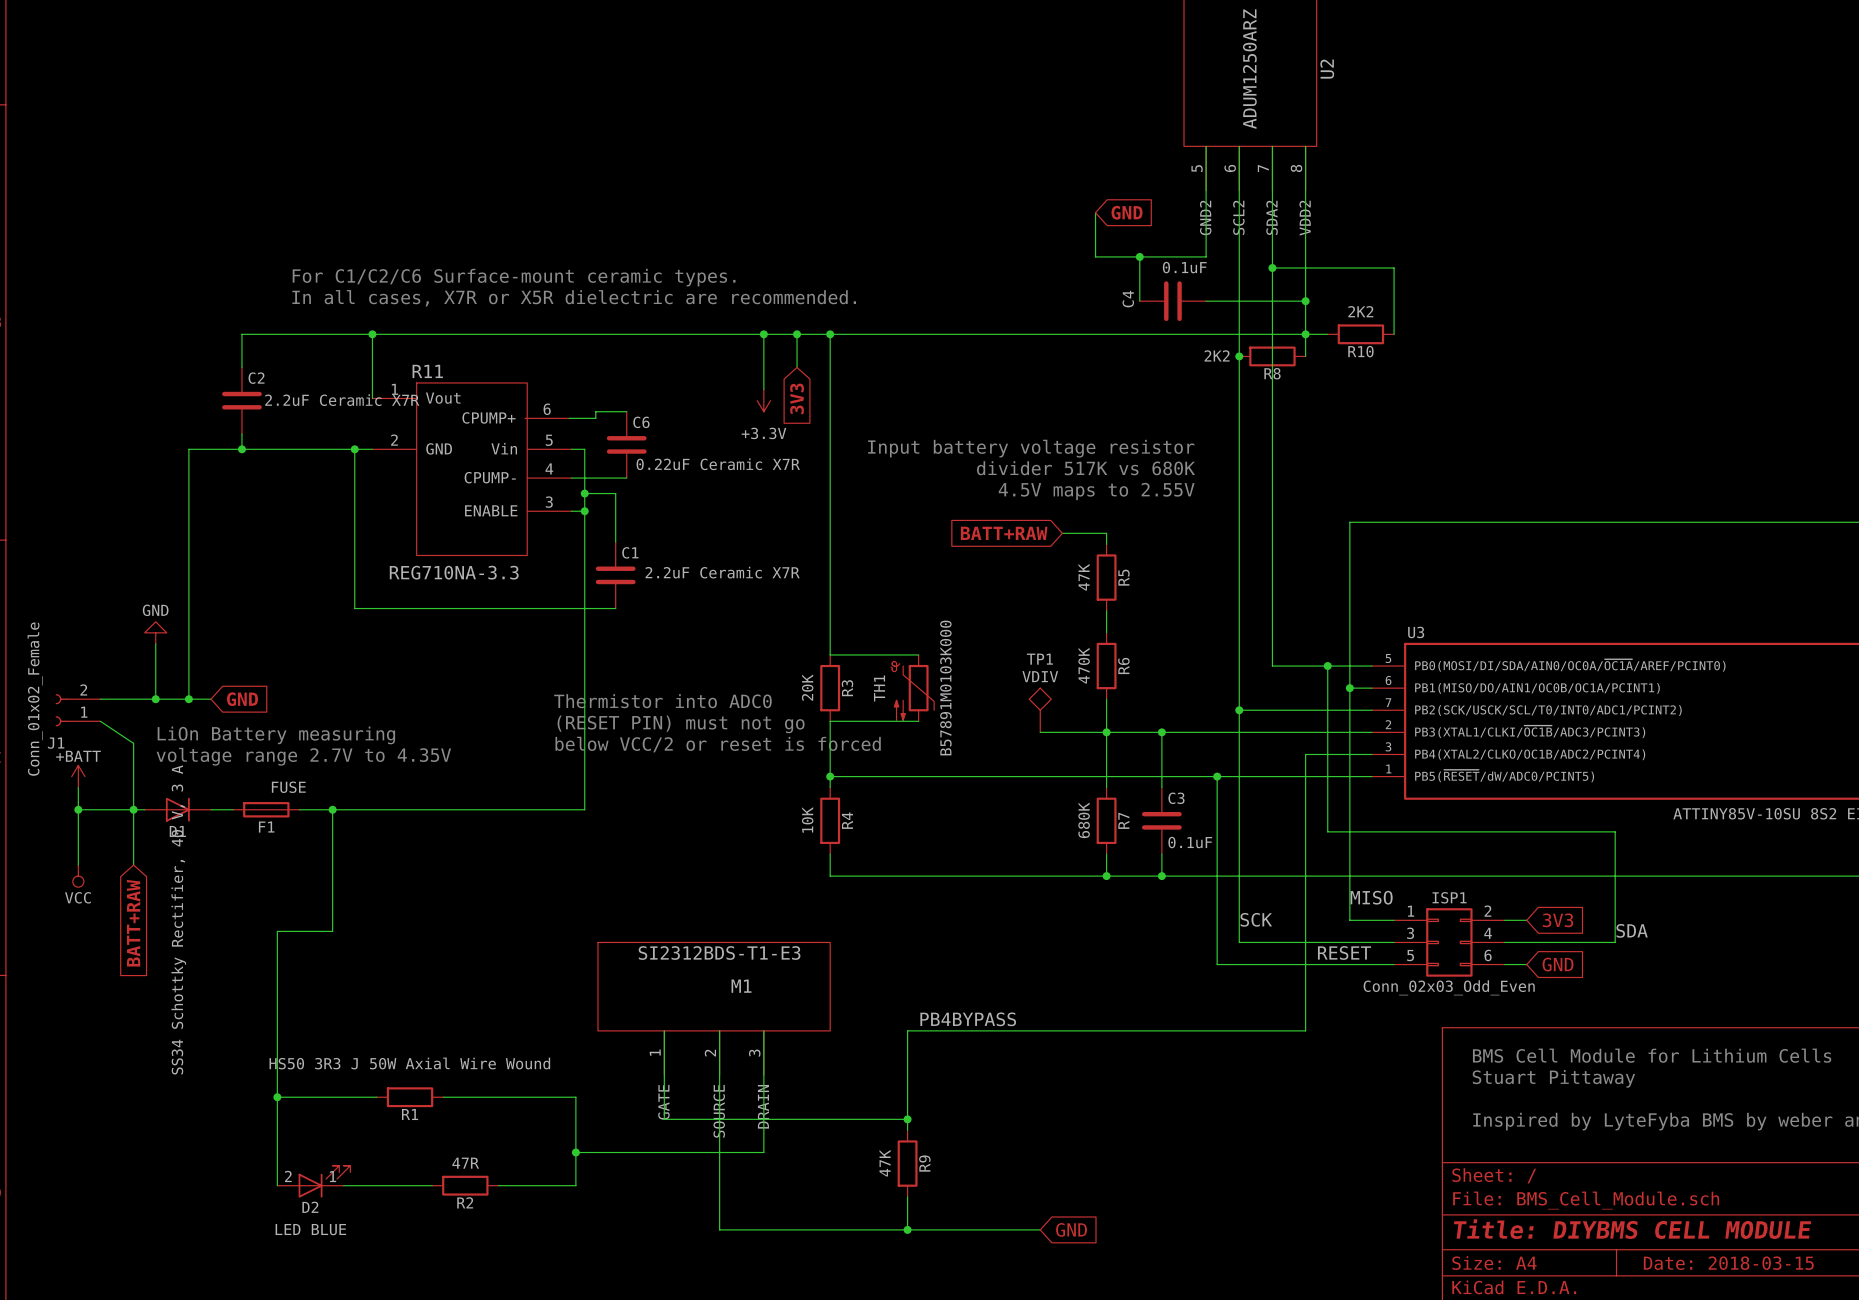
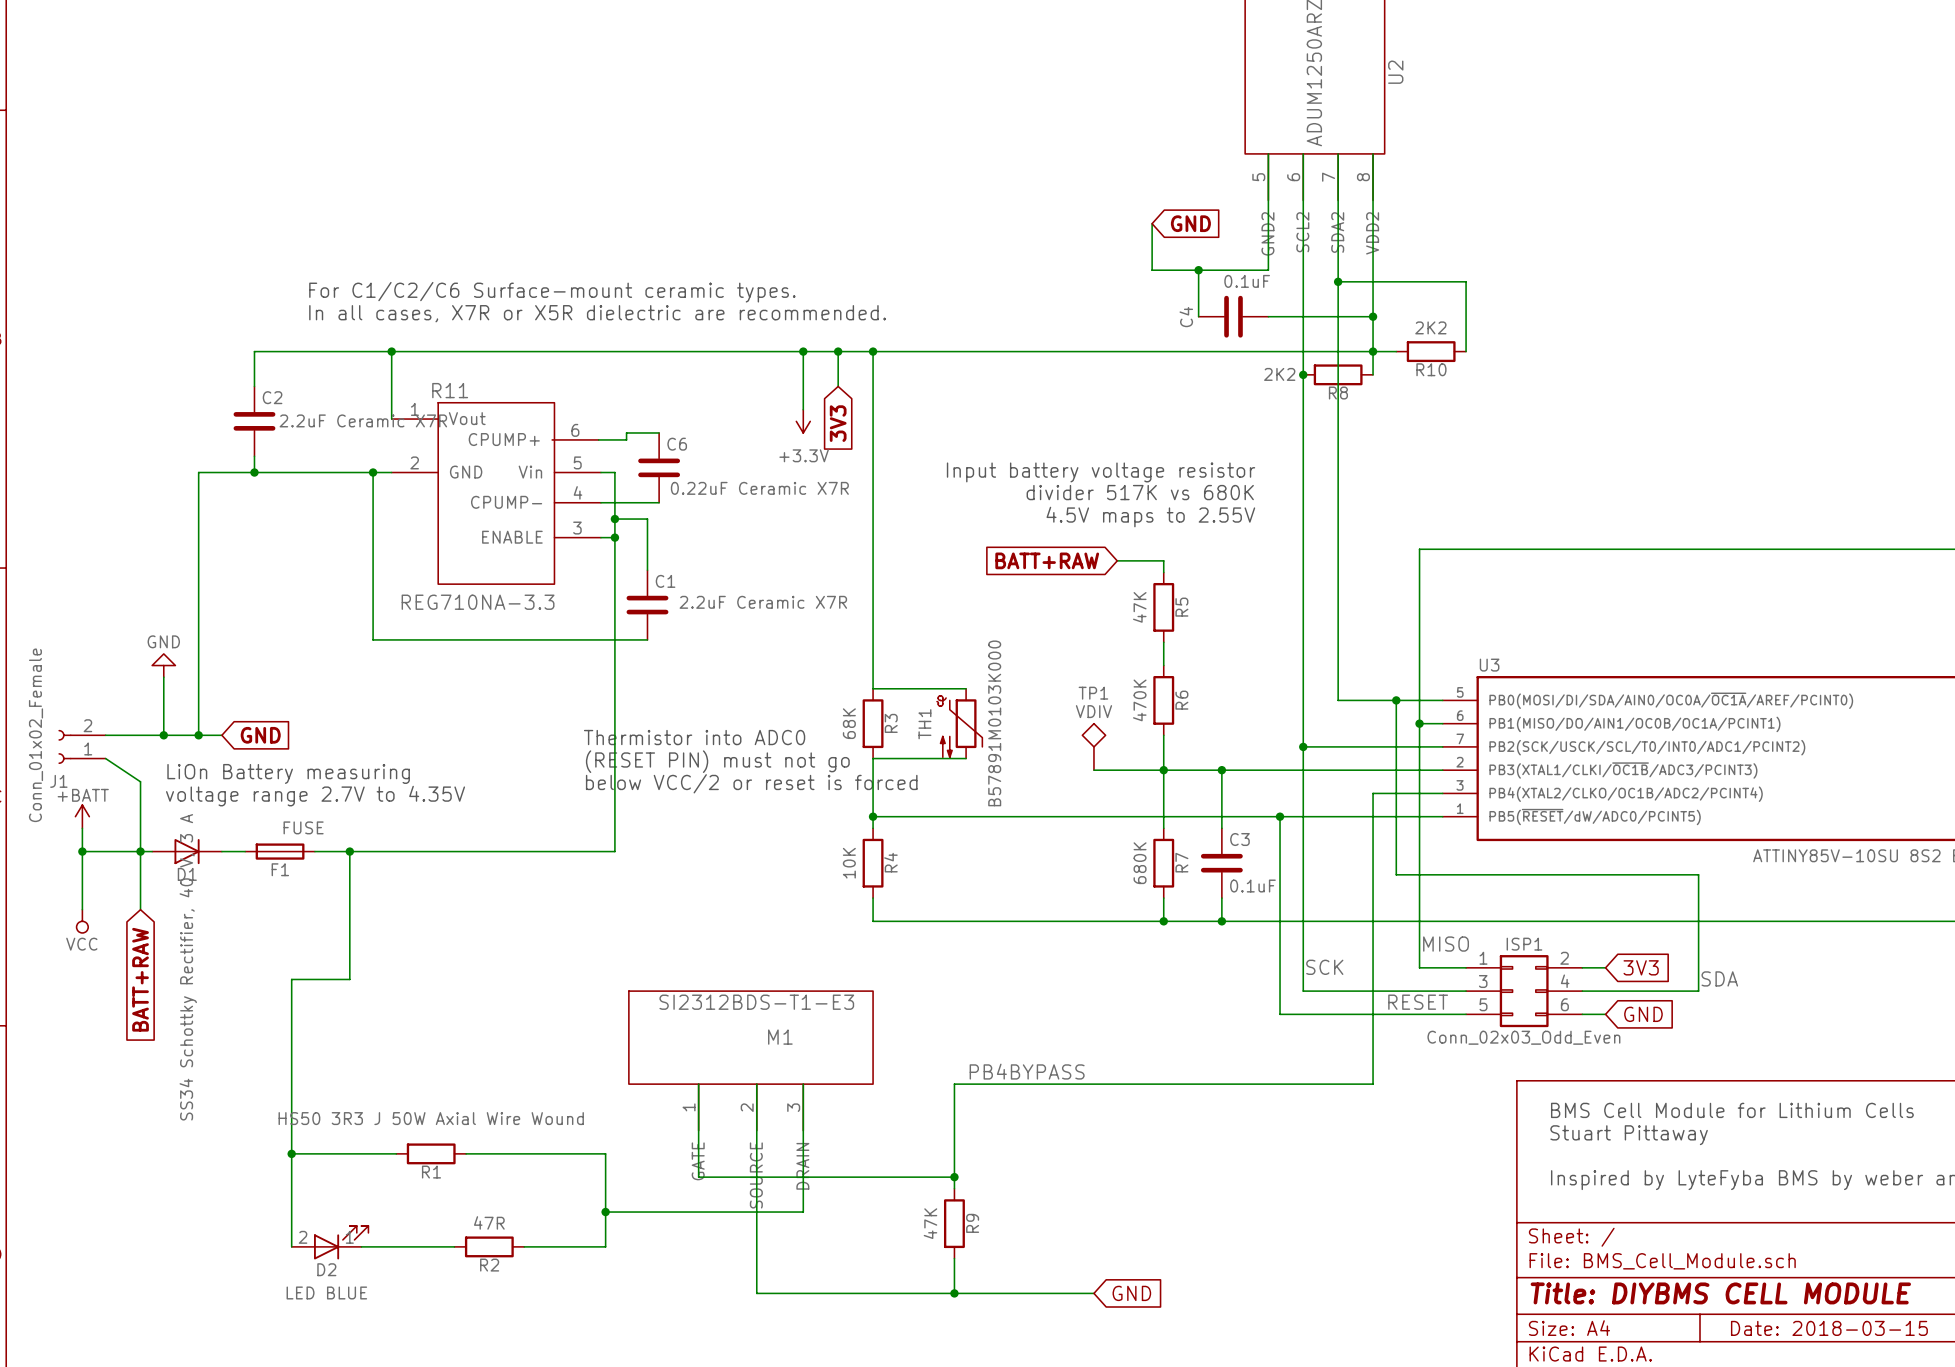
R3 value: 20K (807, 687) -> 68K (849, 723)

